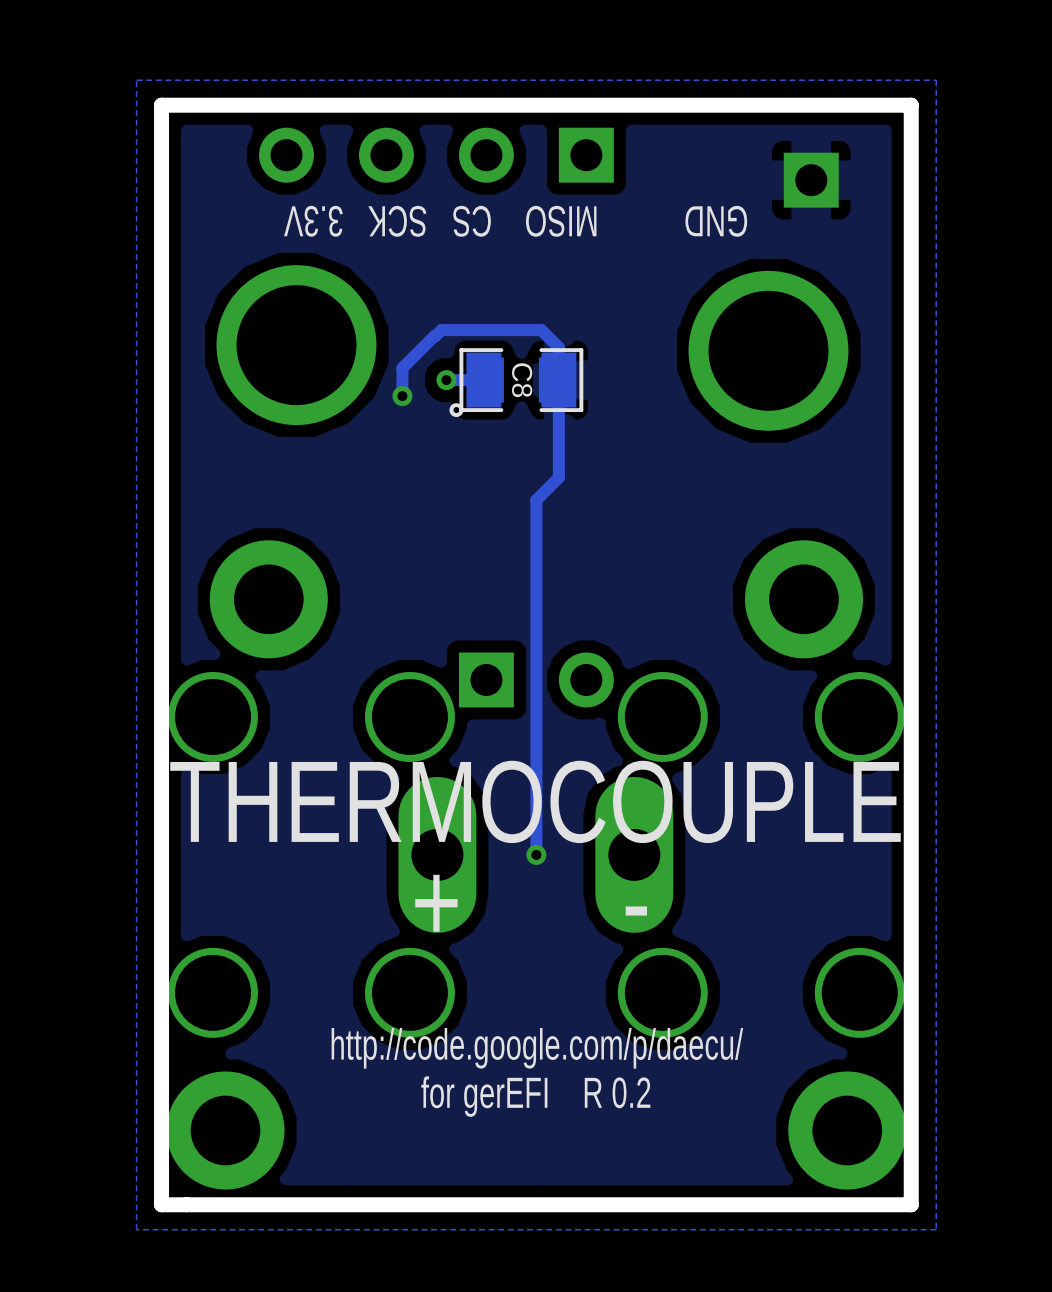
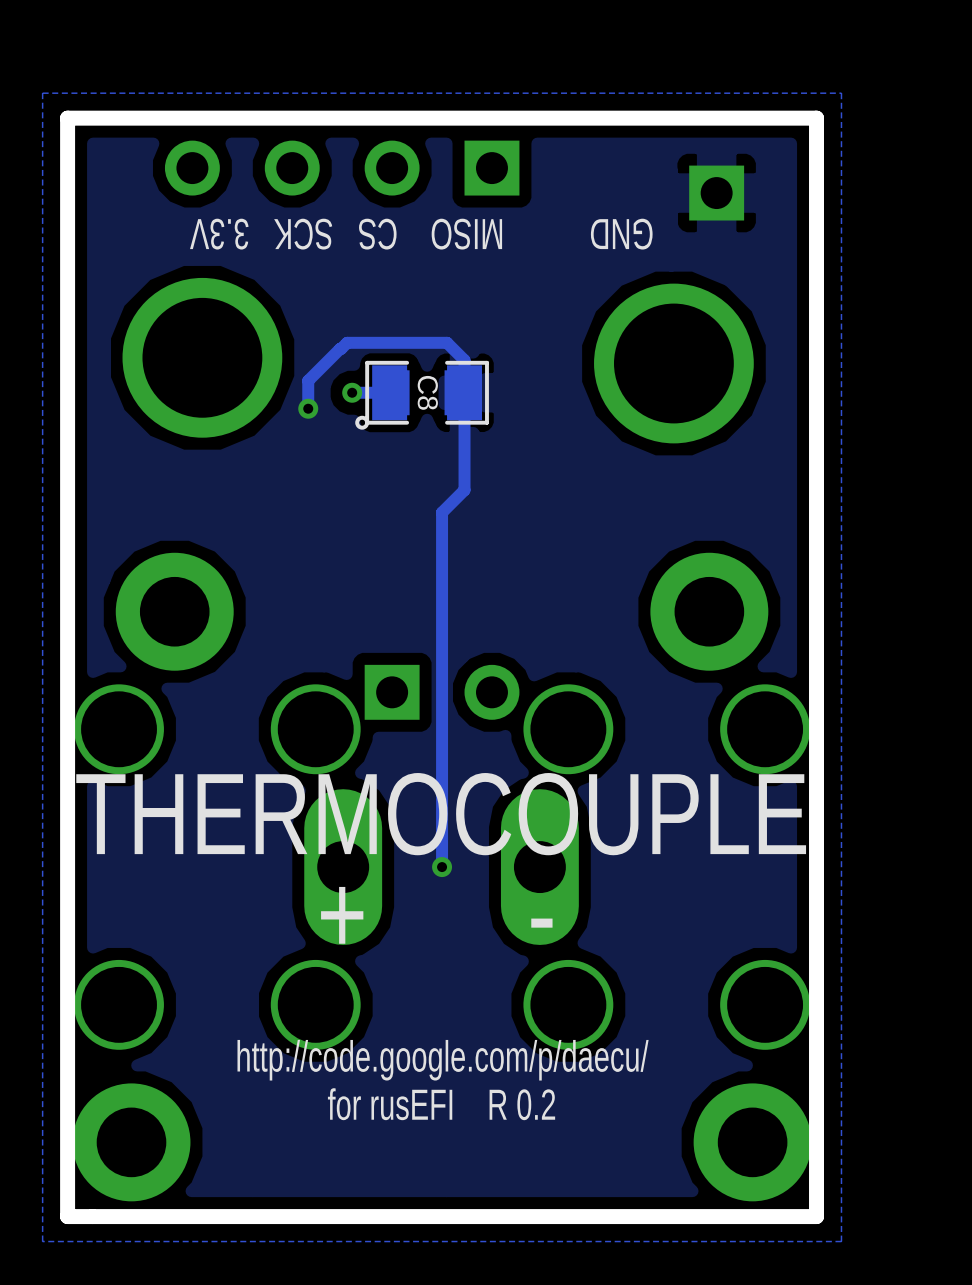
text: for gerEFI R 0.2 (535, 1096) -> for rusEFI R 0.2 (441, 1104)

